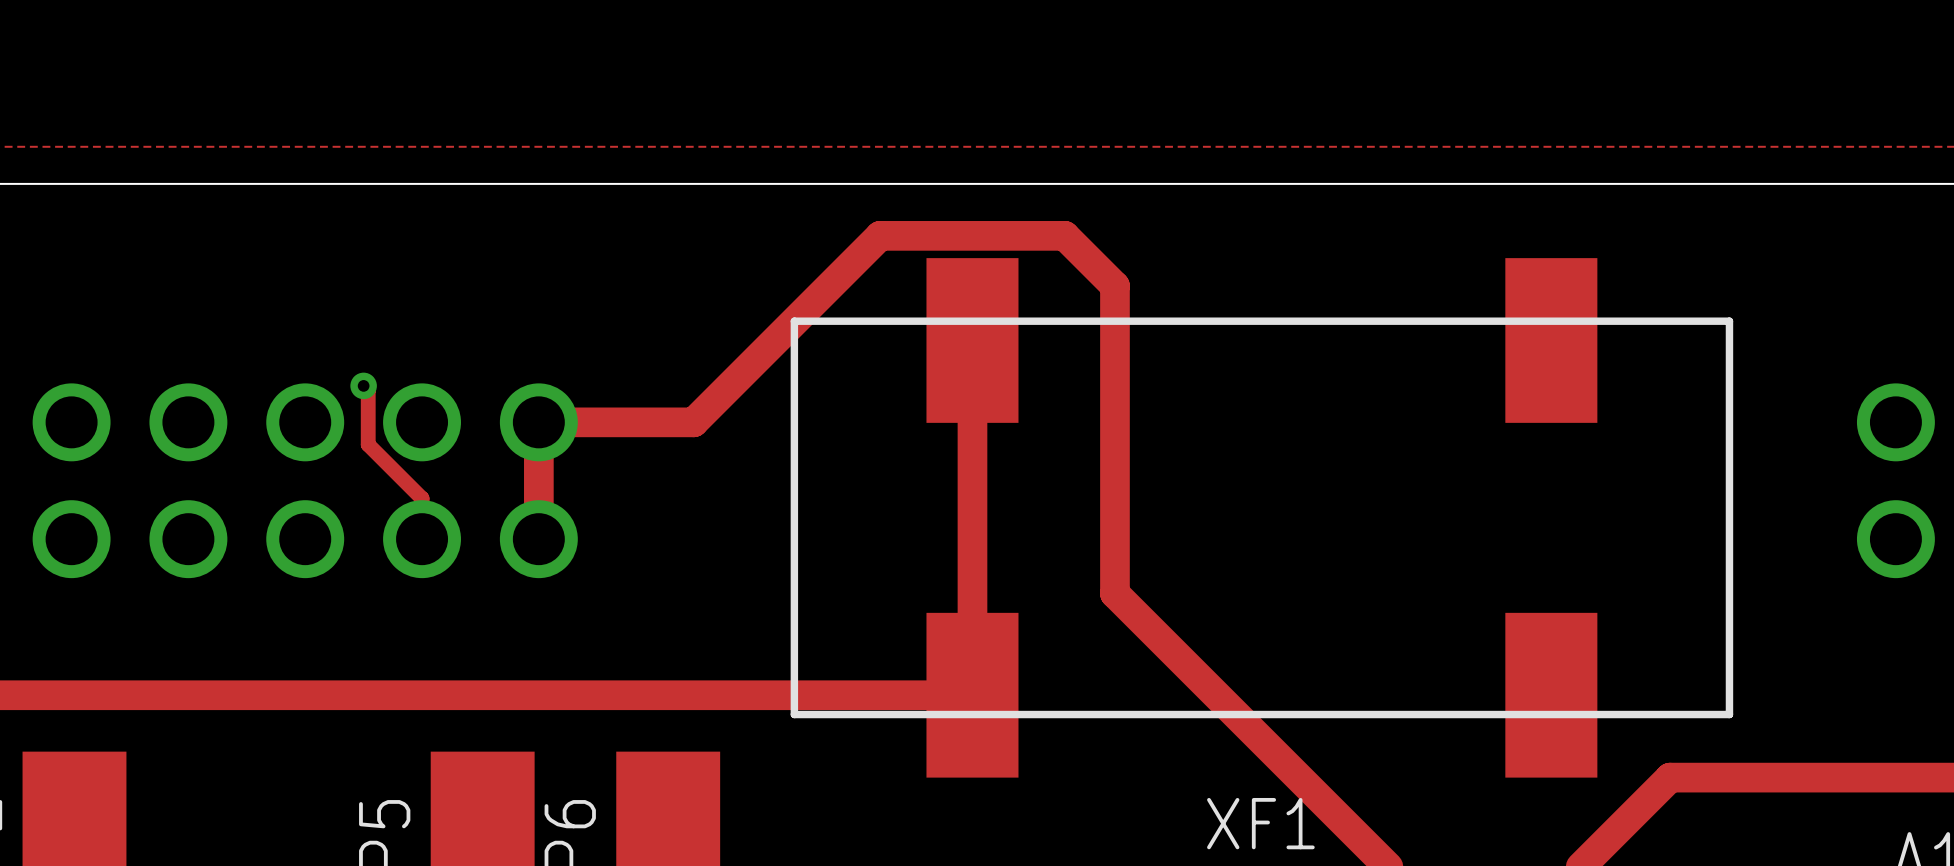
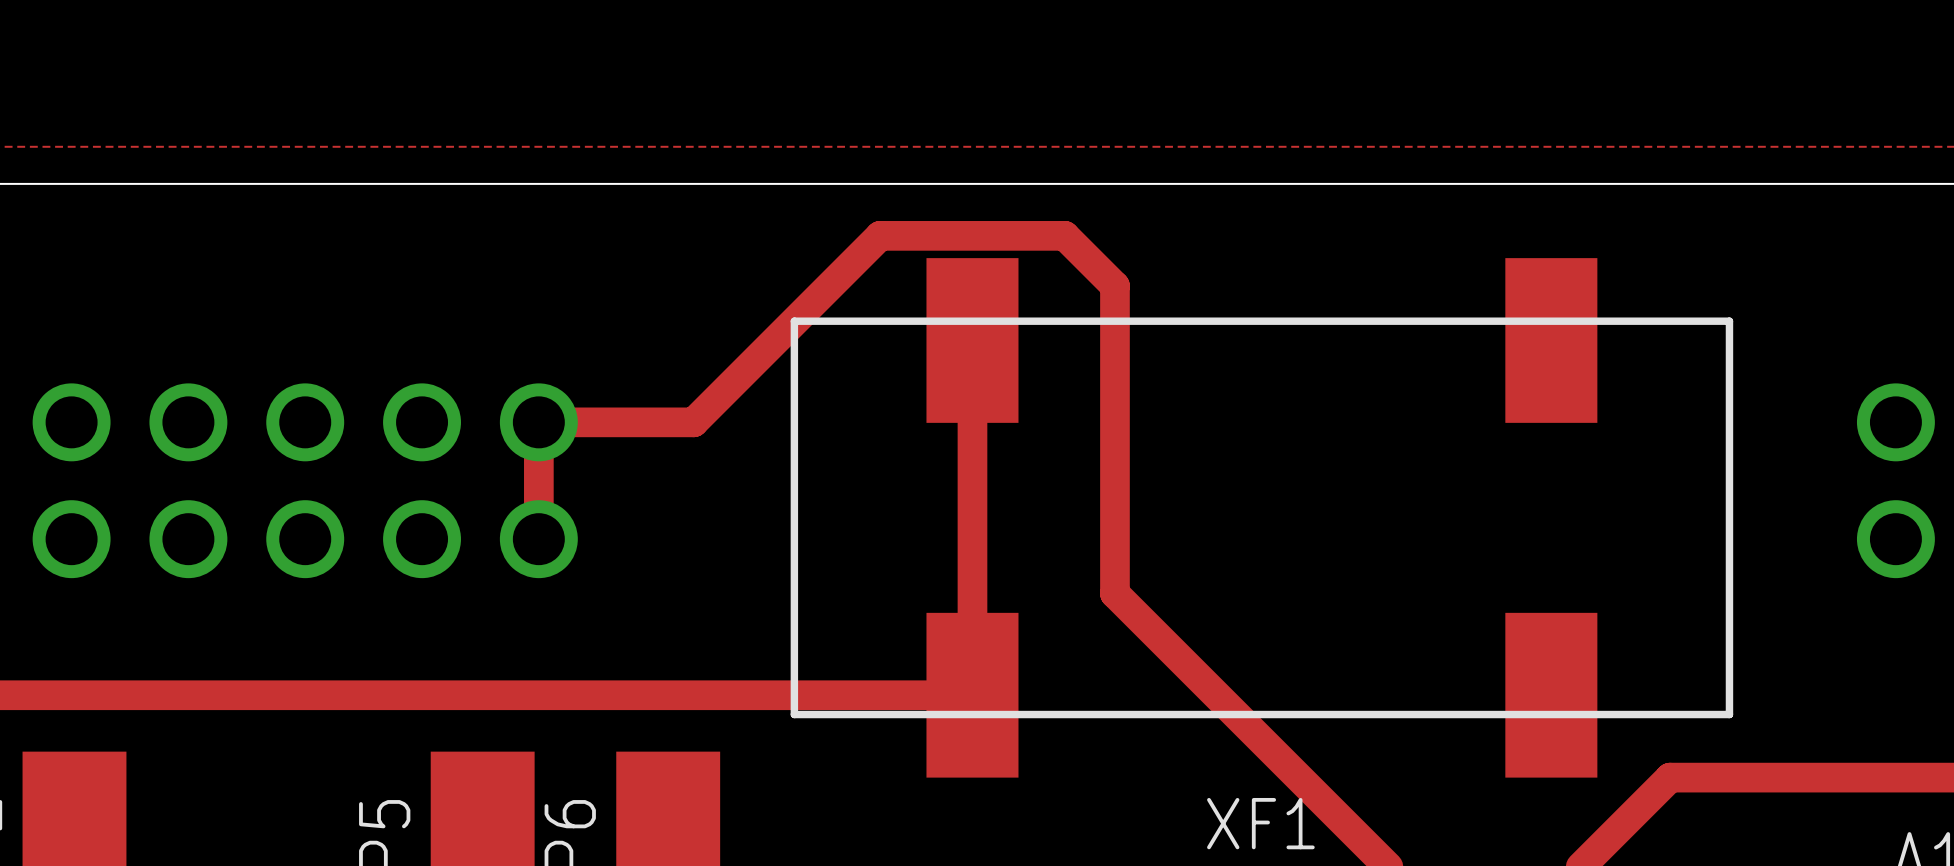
track: (363, 385) (368, 390) (368, 444) (422, 498) (422, 539) -> none
via: (363, 385) -> none

